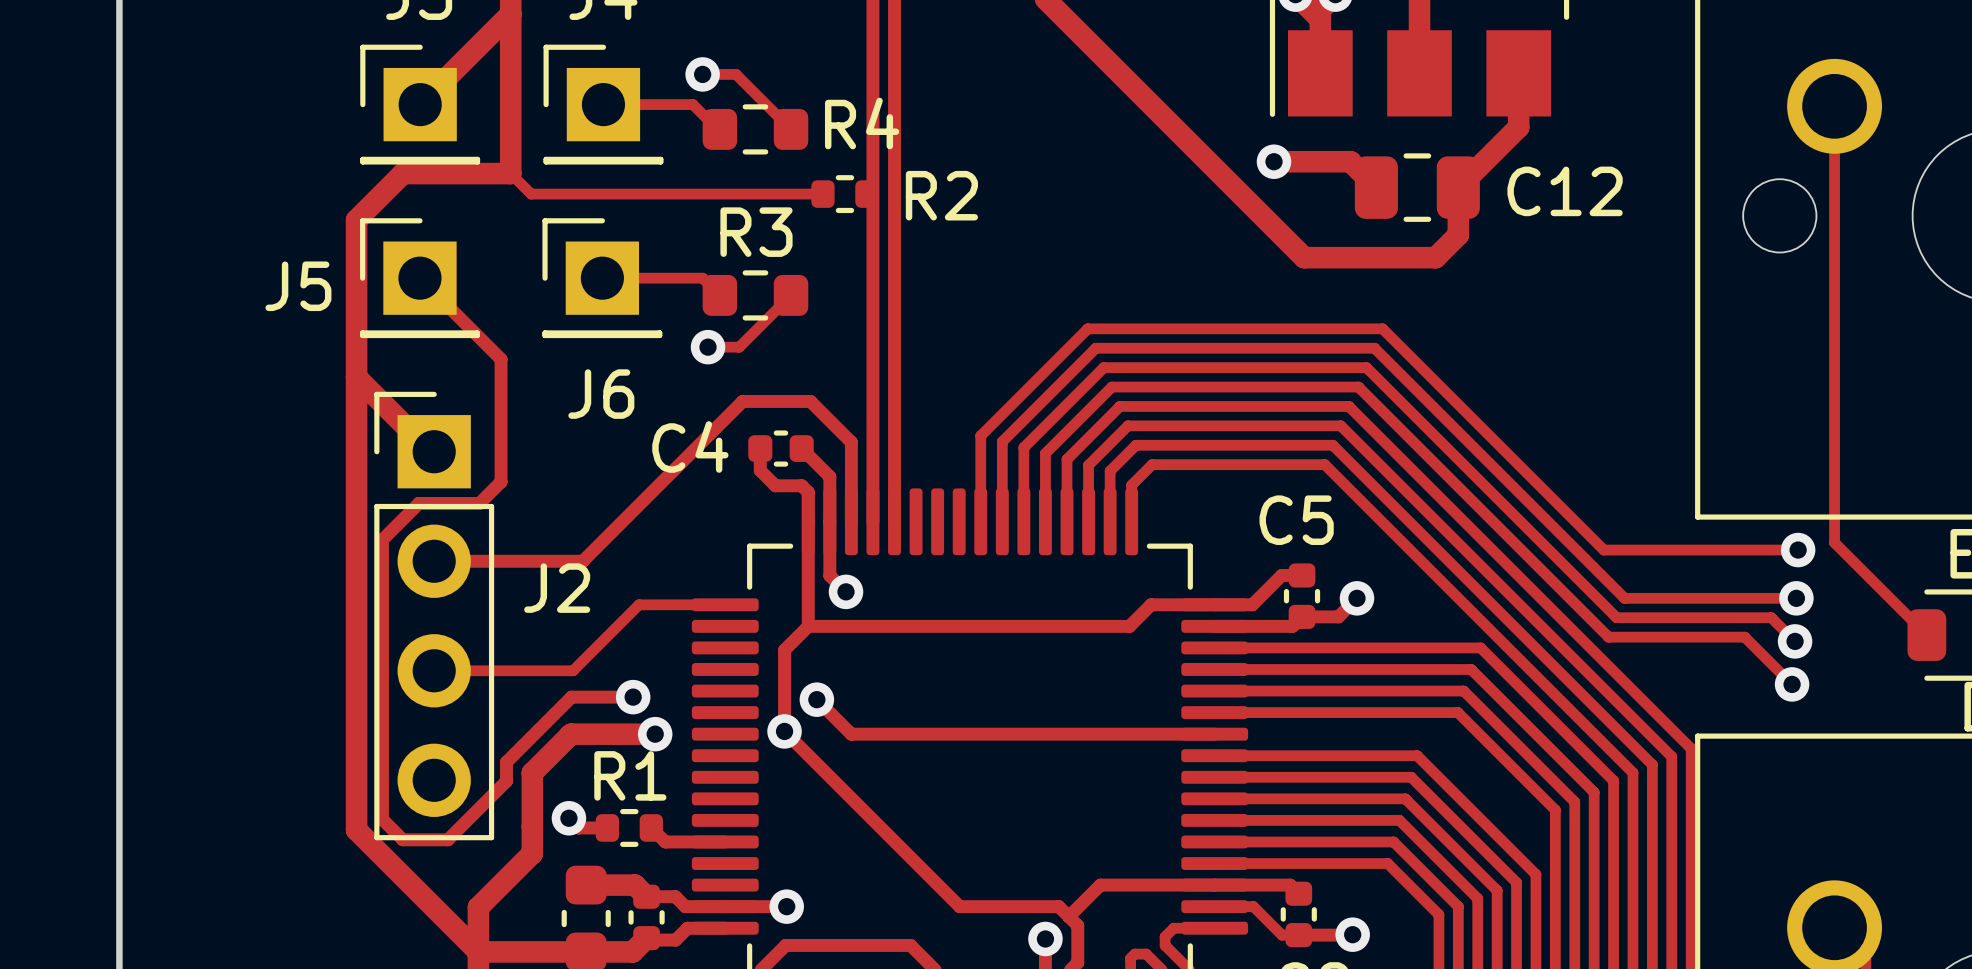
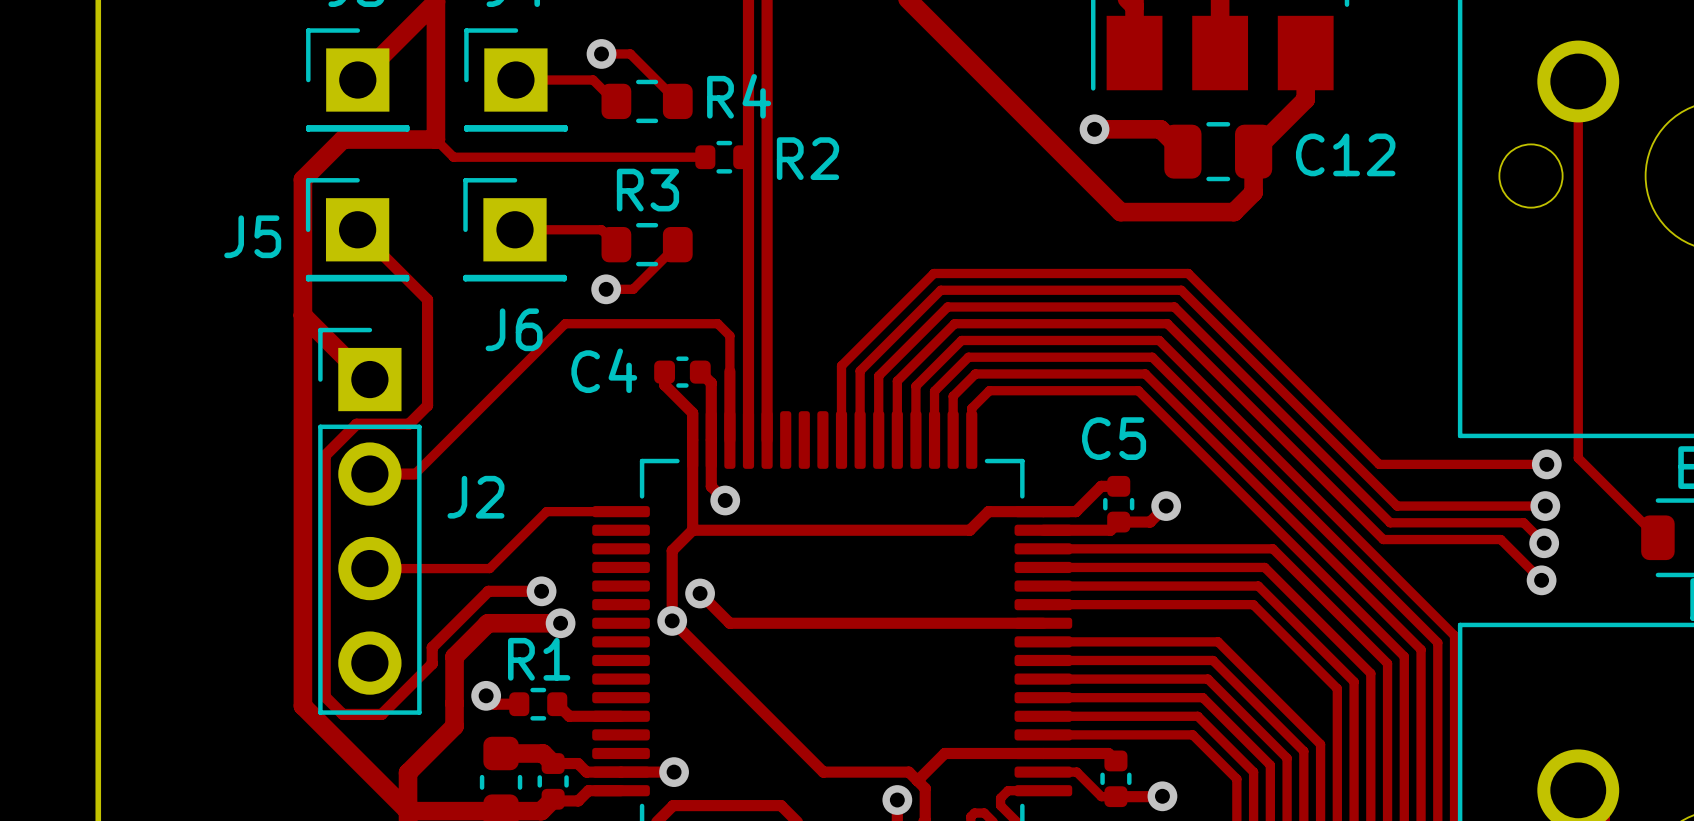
track: (851, 442) (810, 401) (742, 401) (582, 561) (486, 561) -> (729, 371) (729, 335) (717, 323) (565, 323) (414, 474)
track: (760, 448) (760, 470) (775, 485) (801, 485) (808, 492) -> (664, 372) (664, 384) (692, 414)
C4 position: (780, 448) -> (682, 372)
track: (801, 448) (829, 476) -> (700, 372) (711, 383) (711, 401)

